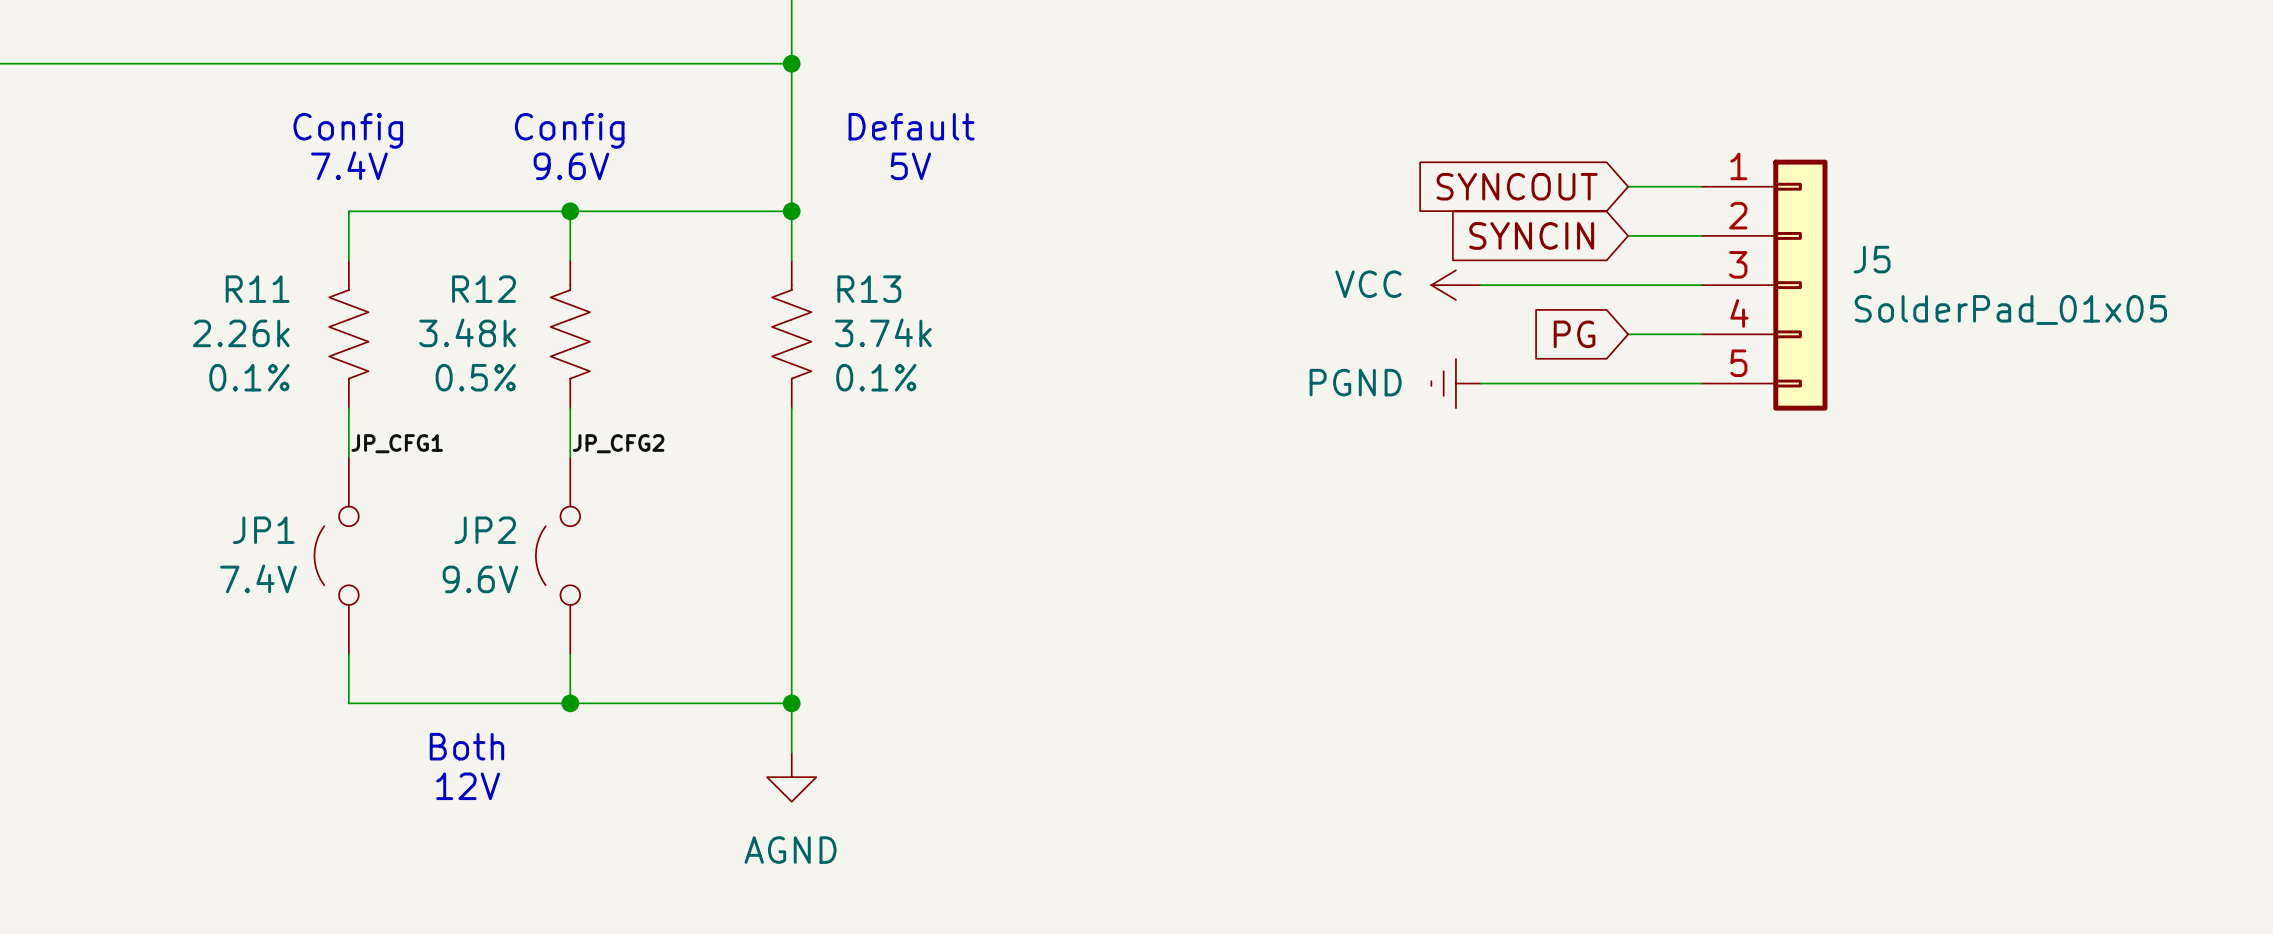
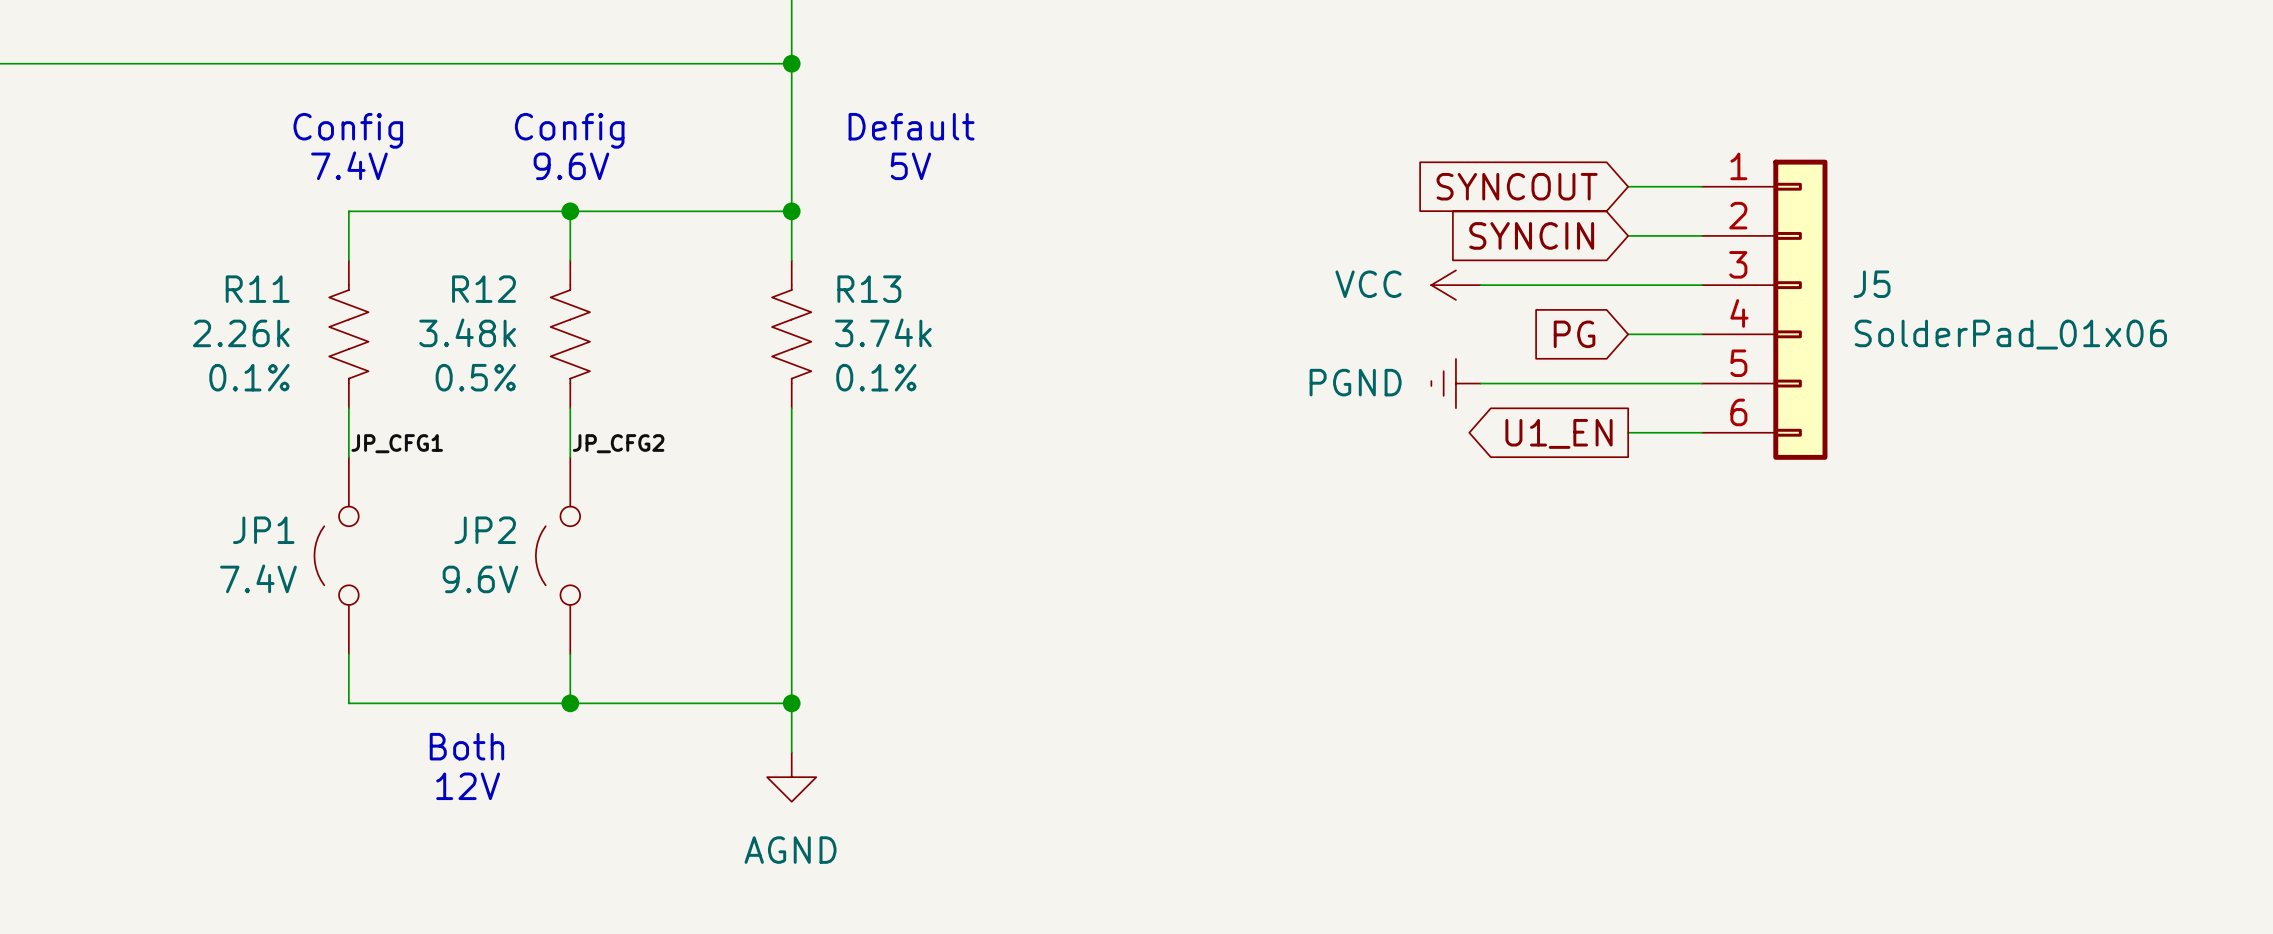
J5 symbol: [1701, 159, 1828, 411] -> [1701, 159, 1828, 460]
J5 value: SolderPad_01x05 (2010, 309) -> SolderPad_01x06 (2010, 334)
wire: none -> (1628, 432) (1701, 432)
global label: none -> U1_EN (1559, 433)

